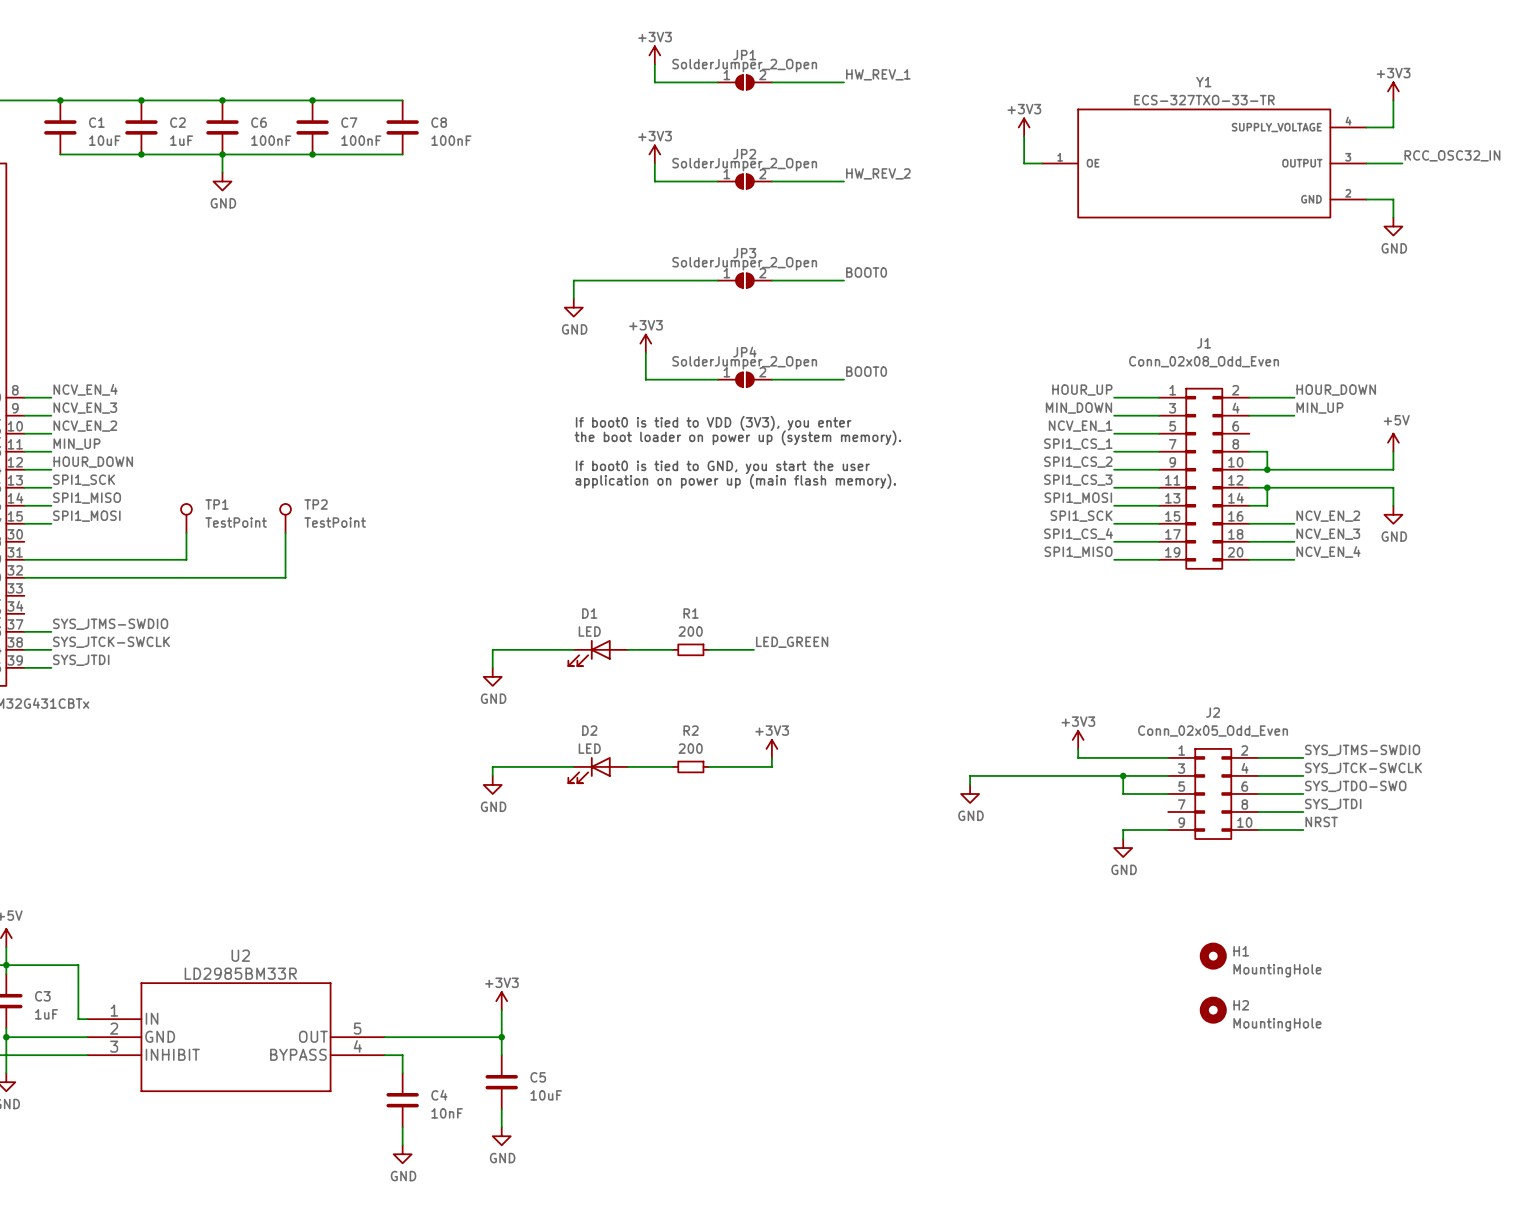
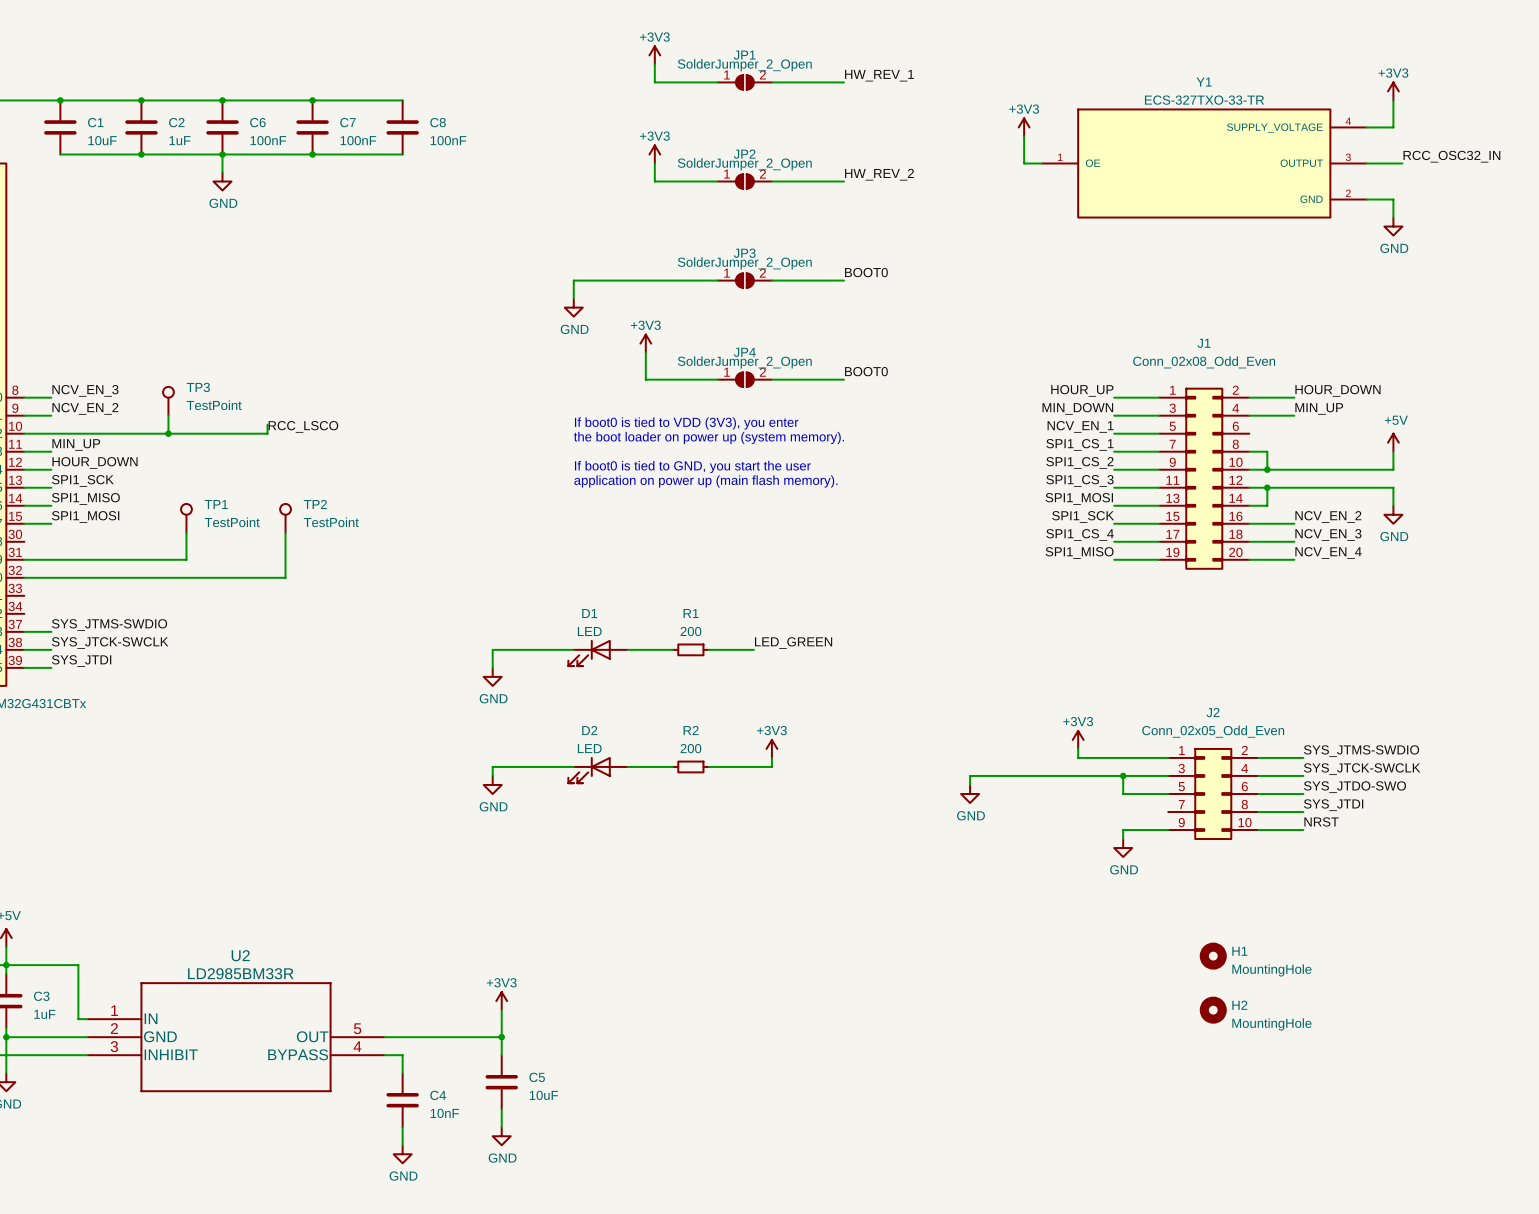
label: NCV_EN_4 (85, 389) -> NCV_EN_3 (85, 390)
TP3: none -> TestPoint (168, 401)
label: NCV_EN_3 (85, 408) -> NCV_EN_2 (85, 408)
wire: none -> (168, 415) (168, 433)
wire: none -> (267, 424) (267, 433) (51, 433)
label: NCV_EN_2 (85, 426) -> none
label: none -> RCC_LSCO (303, 426)
junction: none -> (168, 433)

